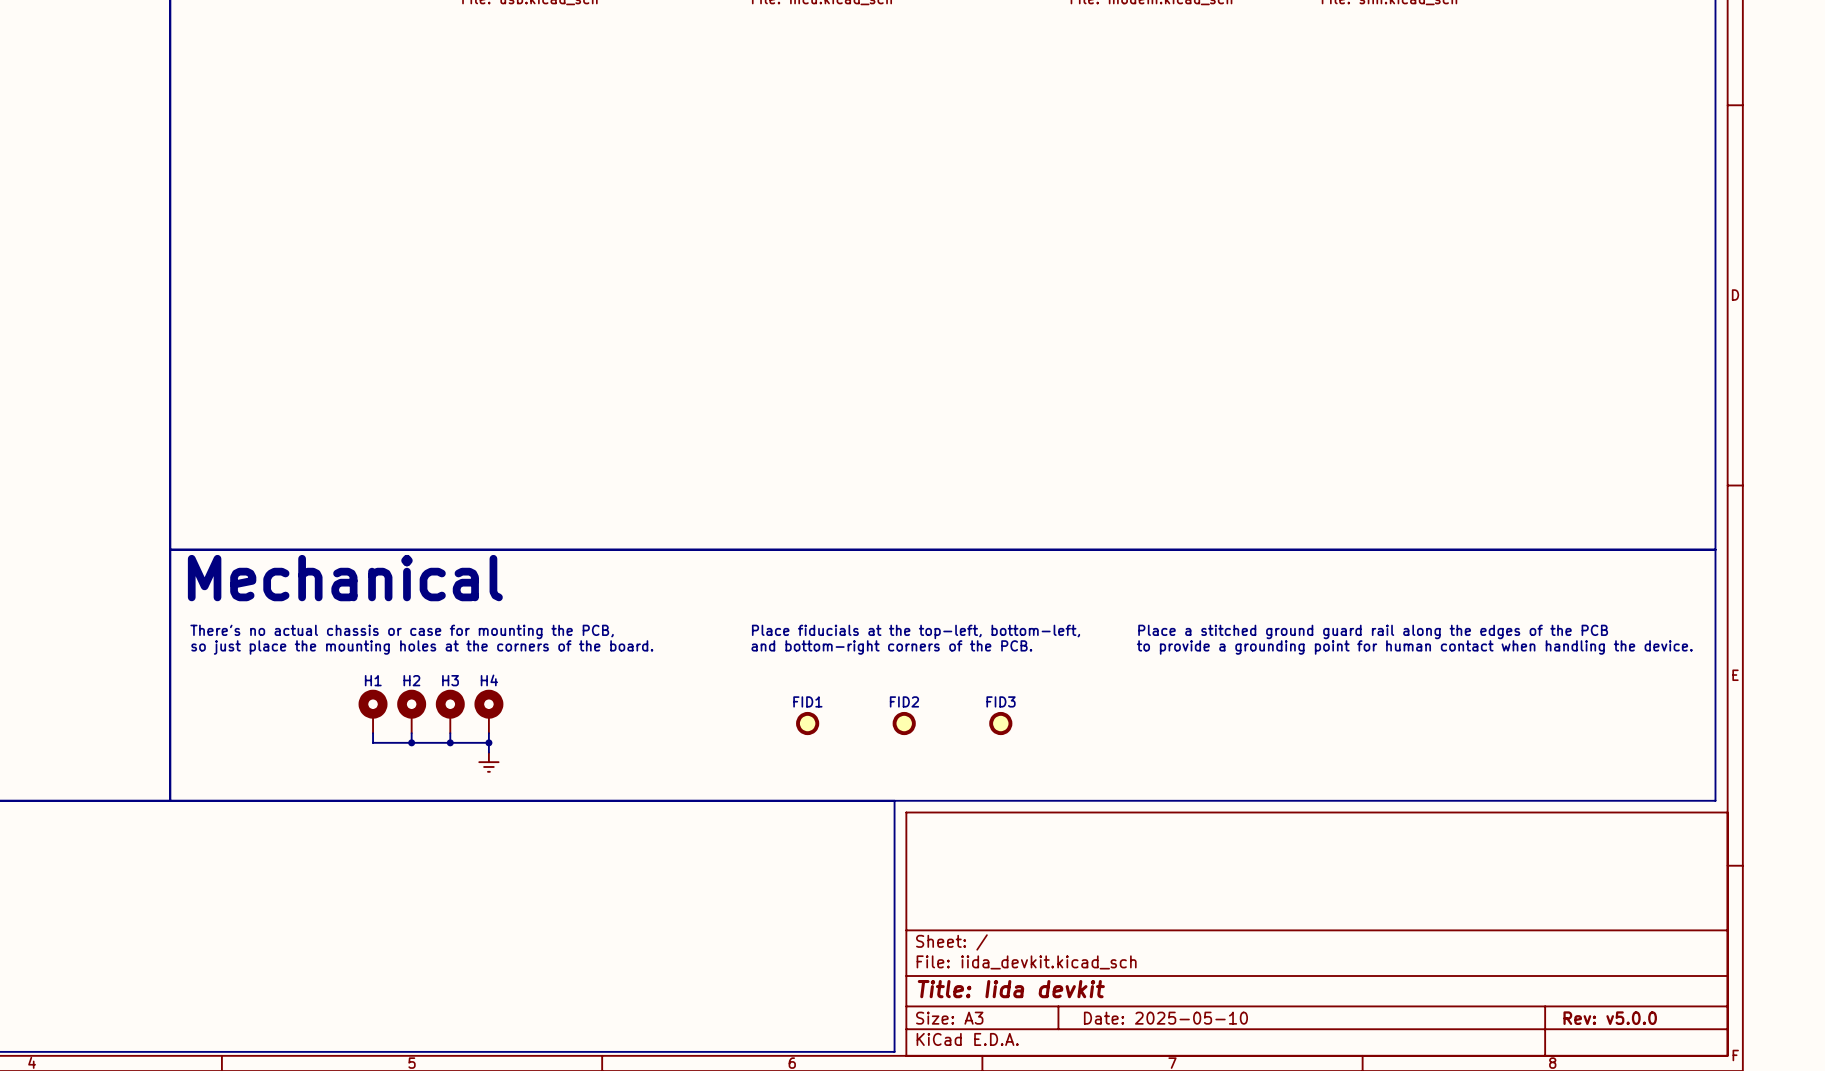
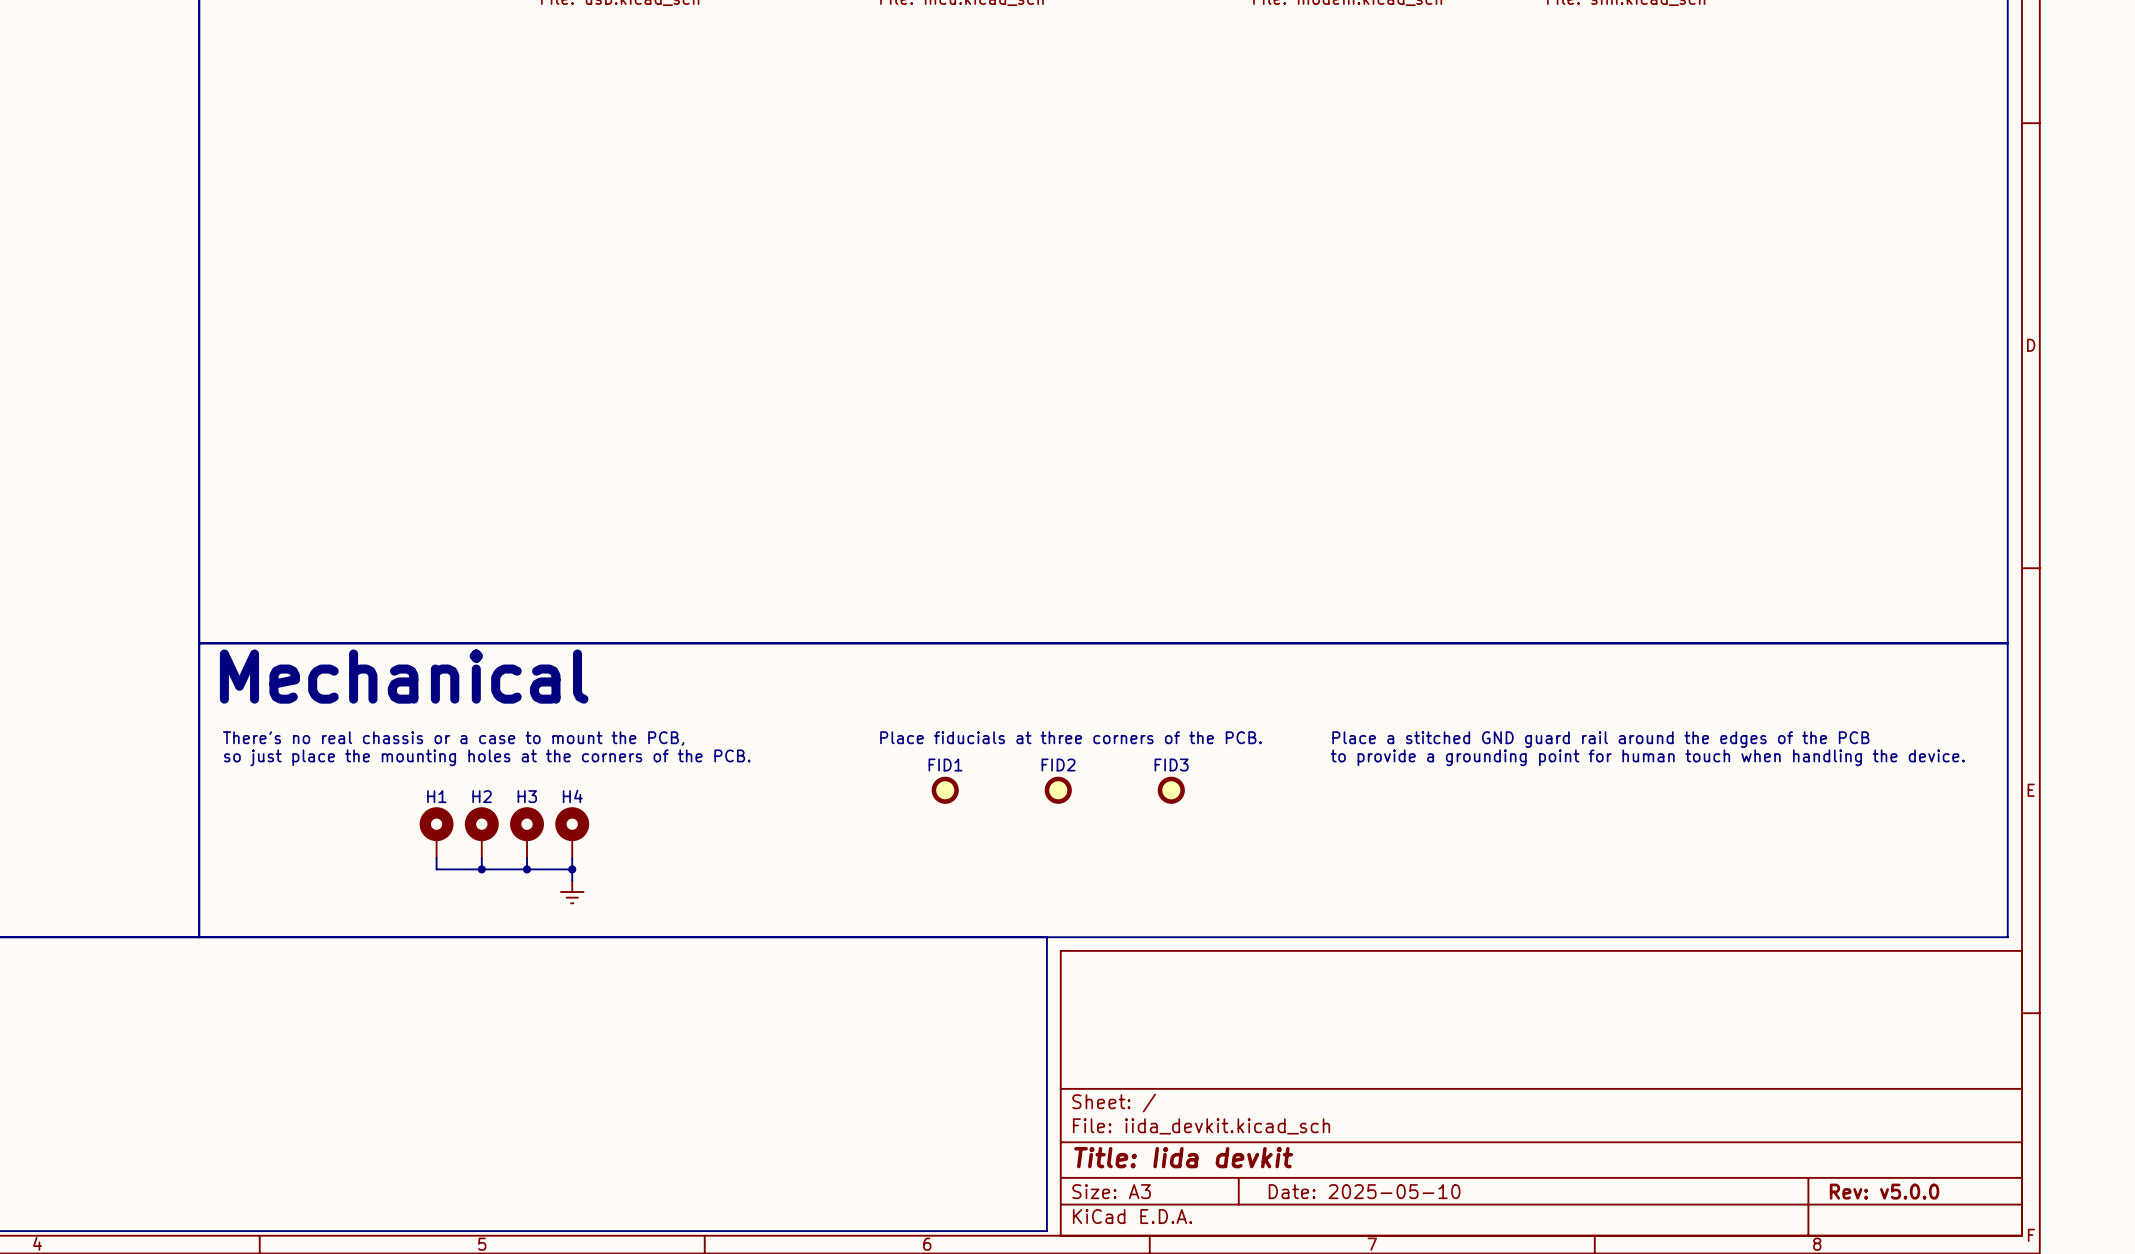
text: There's no actual chassis or case for mounting the PCB, (402, 631) -> There's no real chassis or a case to mount the PCB, (453, 738)
text: Place fiducials at the top-left, bottom-left, (916, 631) -> Place fiducials at three corners of the PCB. (1071, 737)
text: Place a stitched ground guard rail along the edges of the PCB (1373, 631) -> Place a stitched GND guard rail around the edges of the PCB (1600, 739)
text: so just place the mounting holes at the corners of the board. (422, 647) -> so just place the mounting holes at the corners of the PCB. (487, 757)
text: and bottom-right corners of the PCB. (891, 647) -> none
text: to provide a grounding point for human contact when handling the device. (1414, 647) -> to provide a grounding point for human touch when handling the device. (1647, 757)
FID1 position: (807, 723) -> (945, 790)
FID2 position: (904, 723) -> (1058, 790)
FID3 position: (1000, 723) -> (1171, 790)

